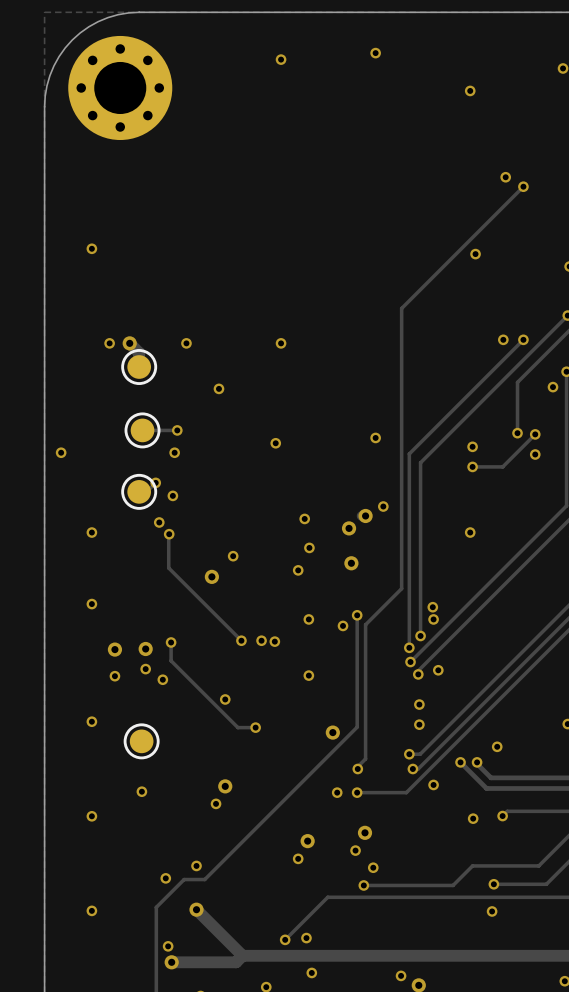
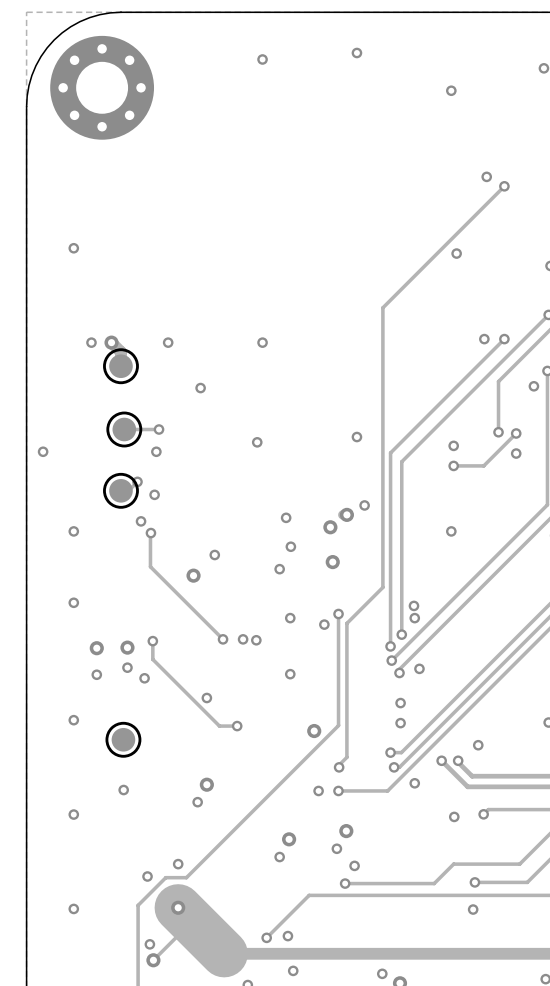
track width: thin (196, 909) (242, 955) -> thick (178, 907) (224, 953)
track: (242, 955) (236, 962) (171, 962) -> (191, 921) (153, 960)

